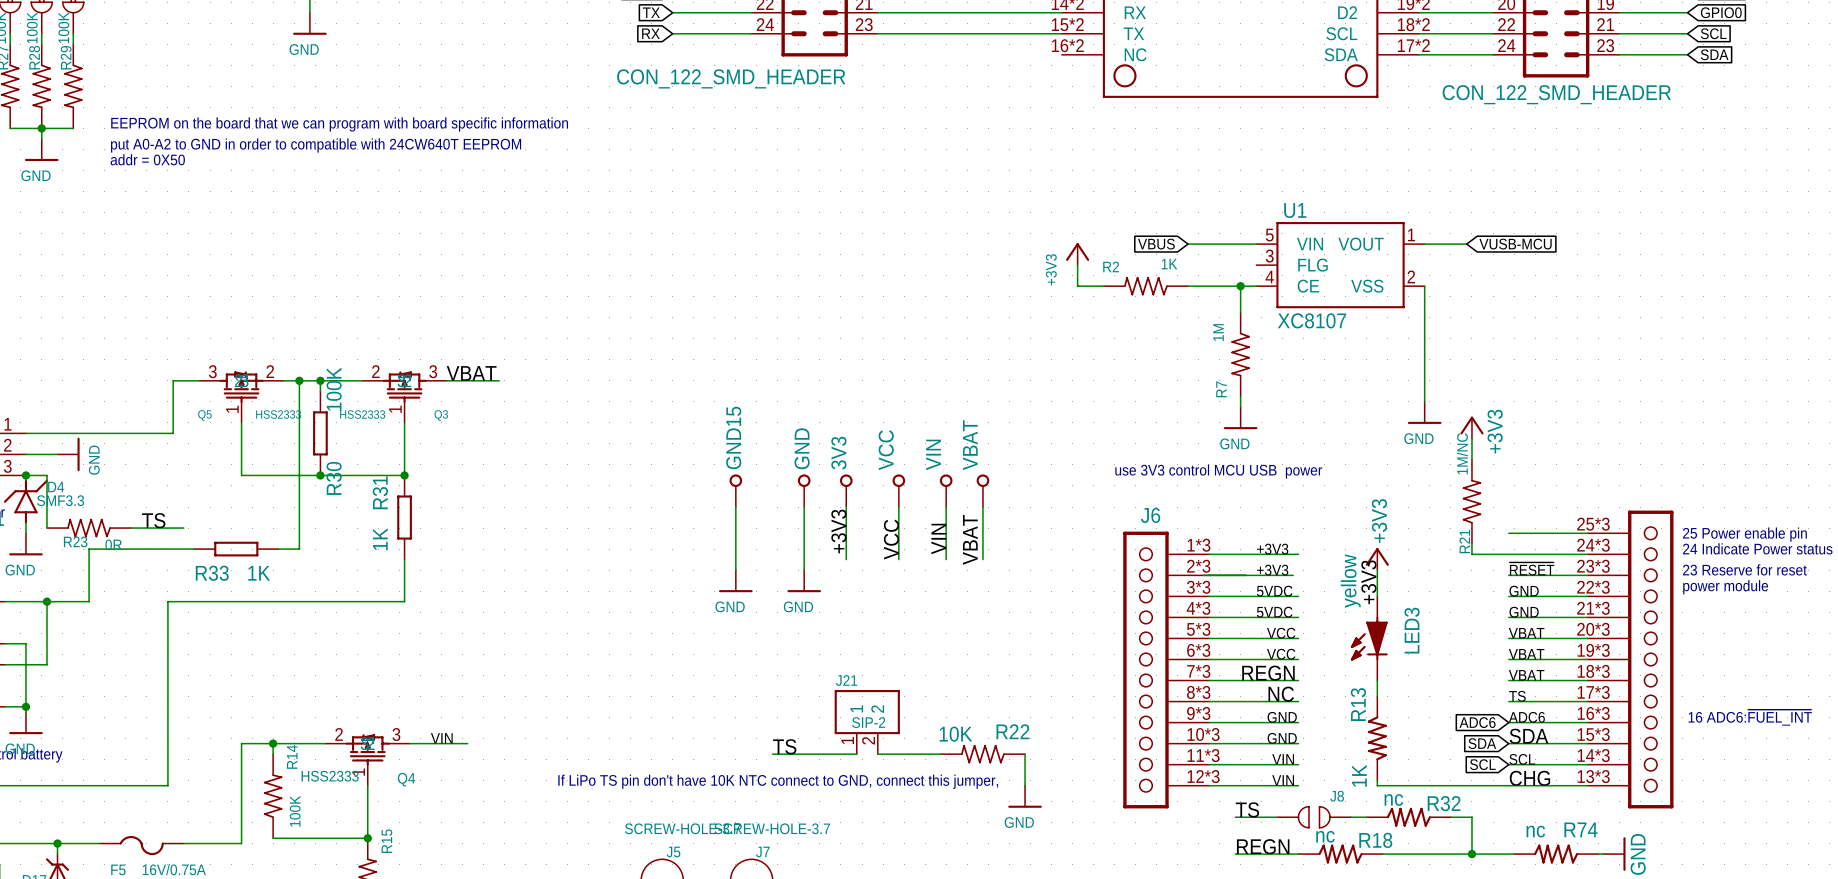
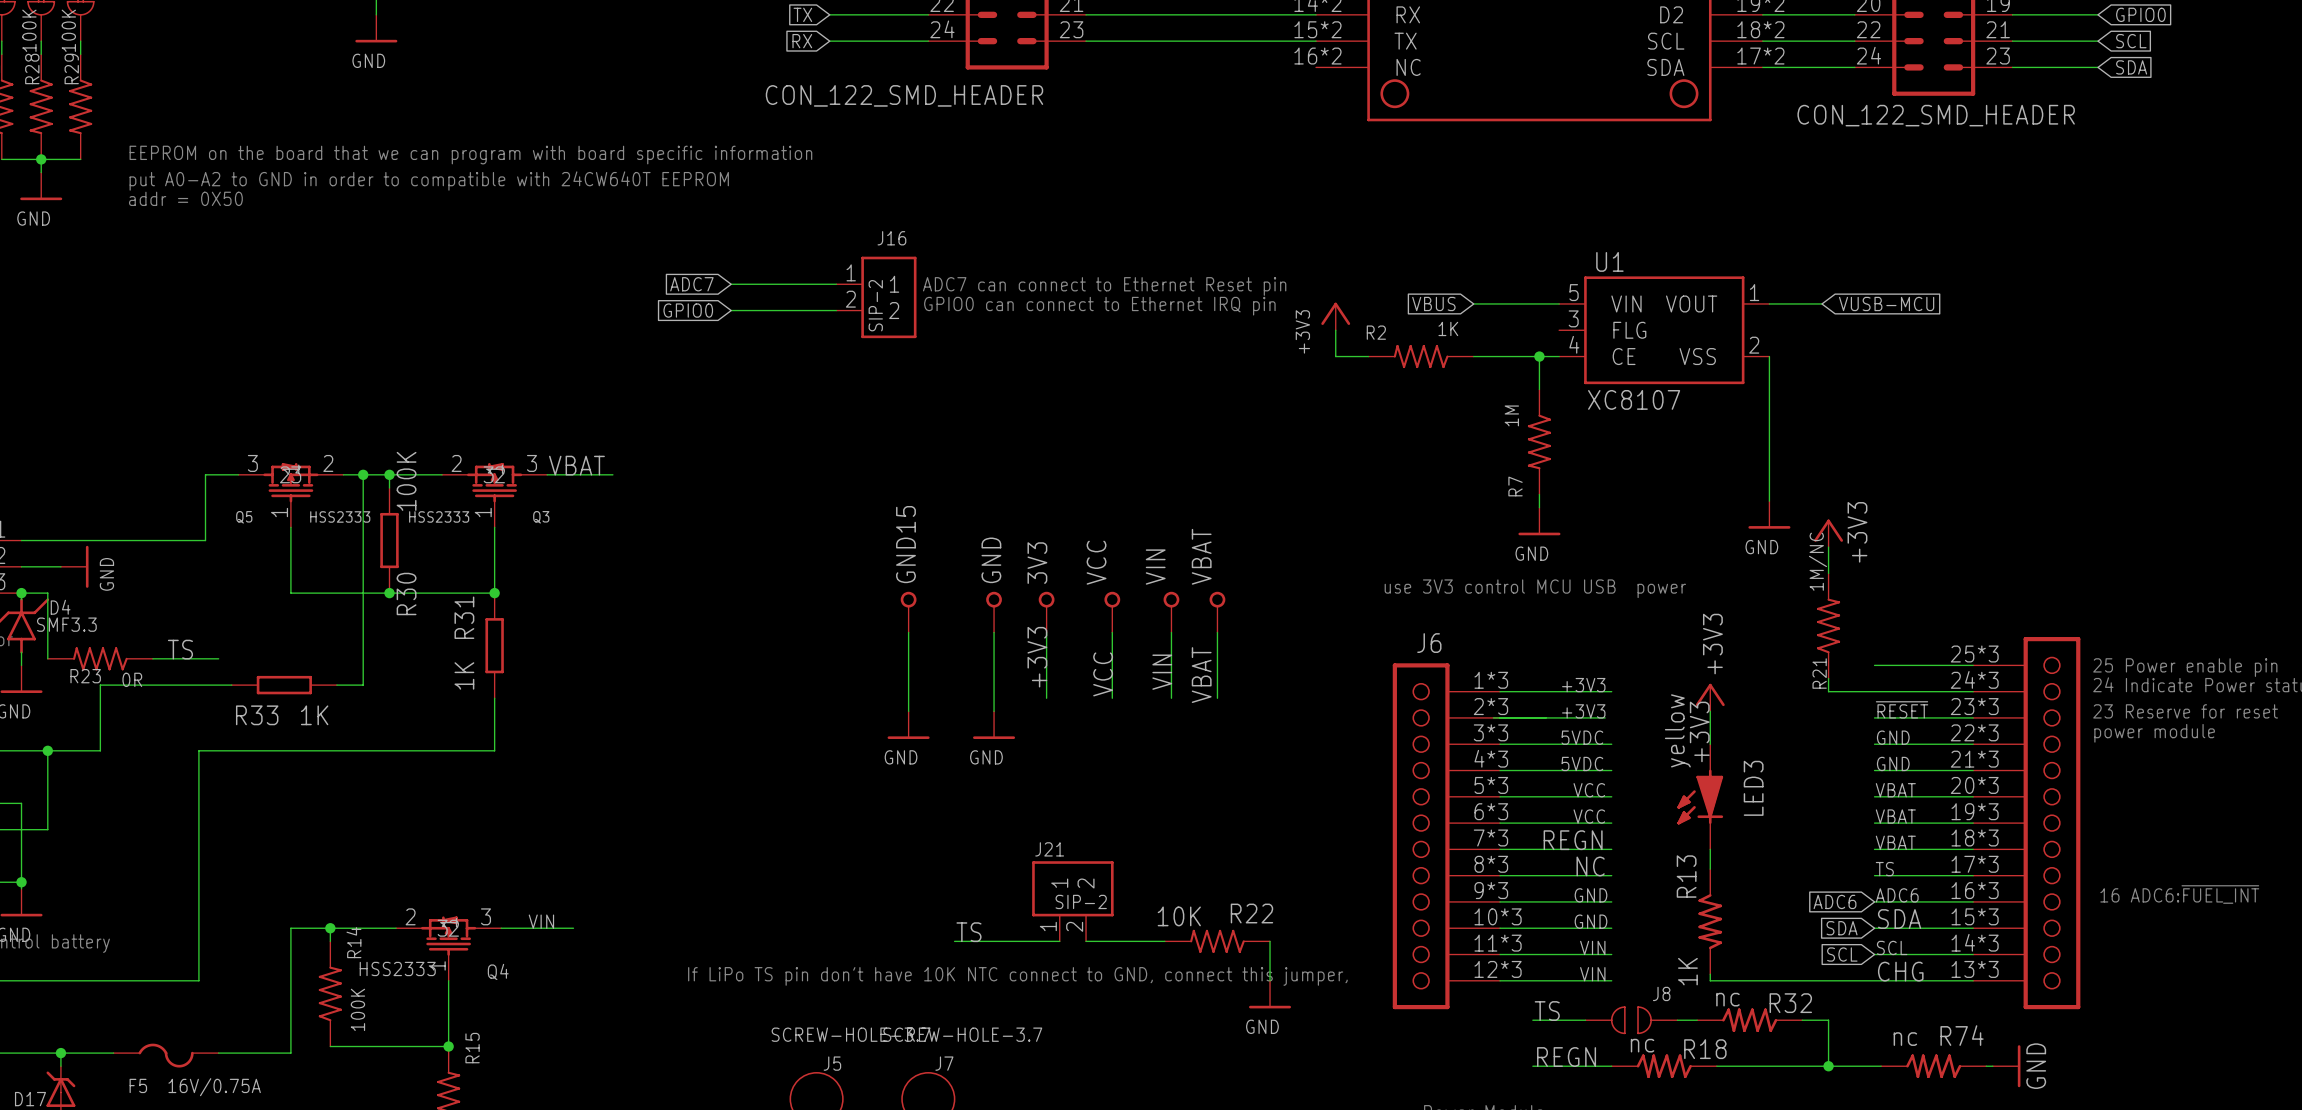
global label: none -> ADC7 (691, 284)
wire: none -> (731, 284) (836, 284)
text: none -> ADC7 can connect to Ethernet Reset pin (1104, 286)
J16: none -> SIP-2 (876, 297)
text: none -> GPIO0 can connect to Ethernet IRQ pin (1099, 306)
global label: none -> GPIO0 (688, 310)
wire: none -> (731, 310) (836, 310)

